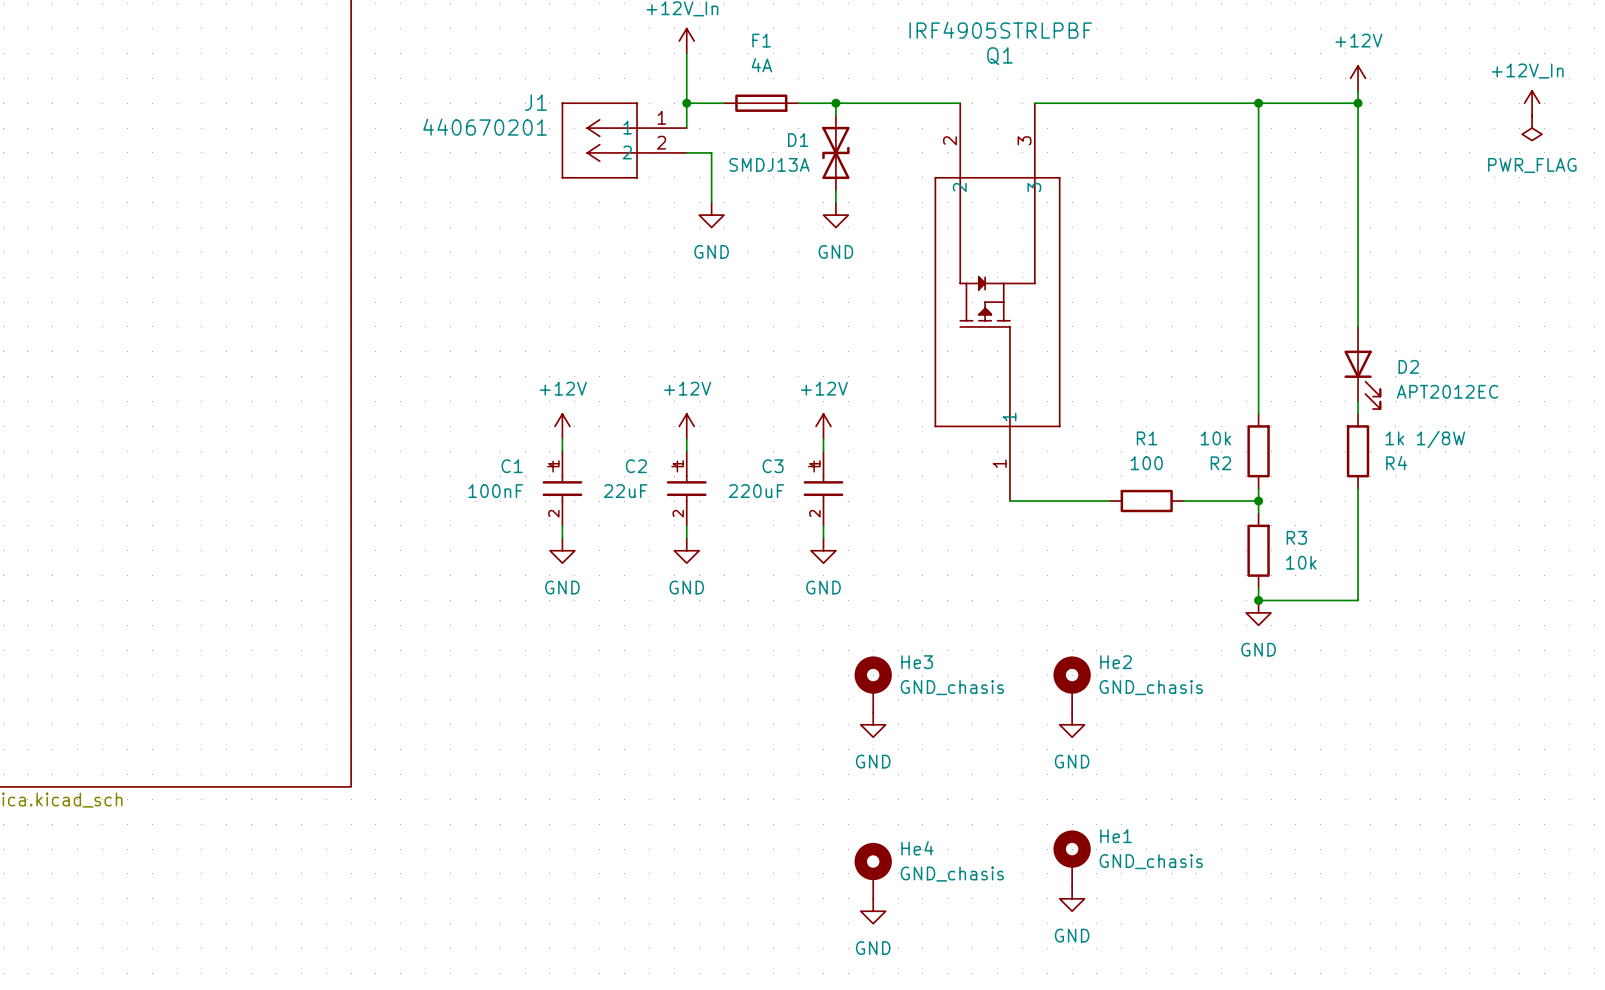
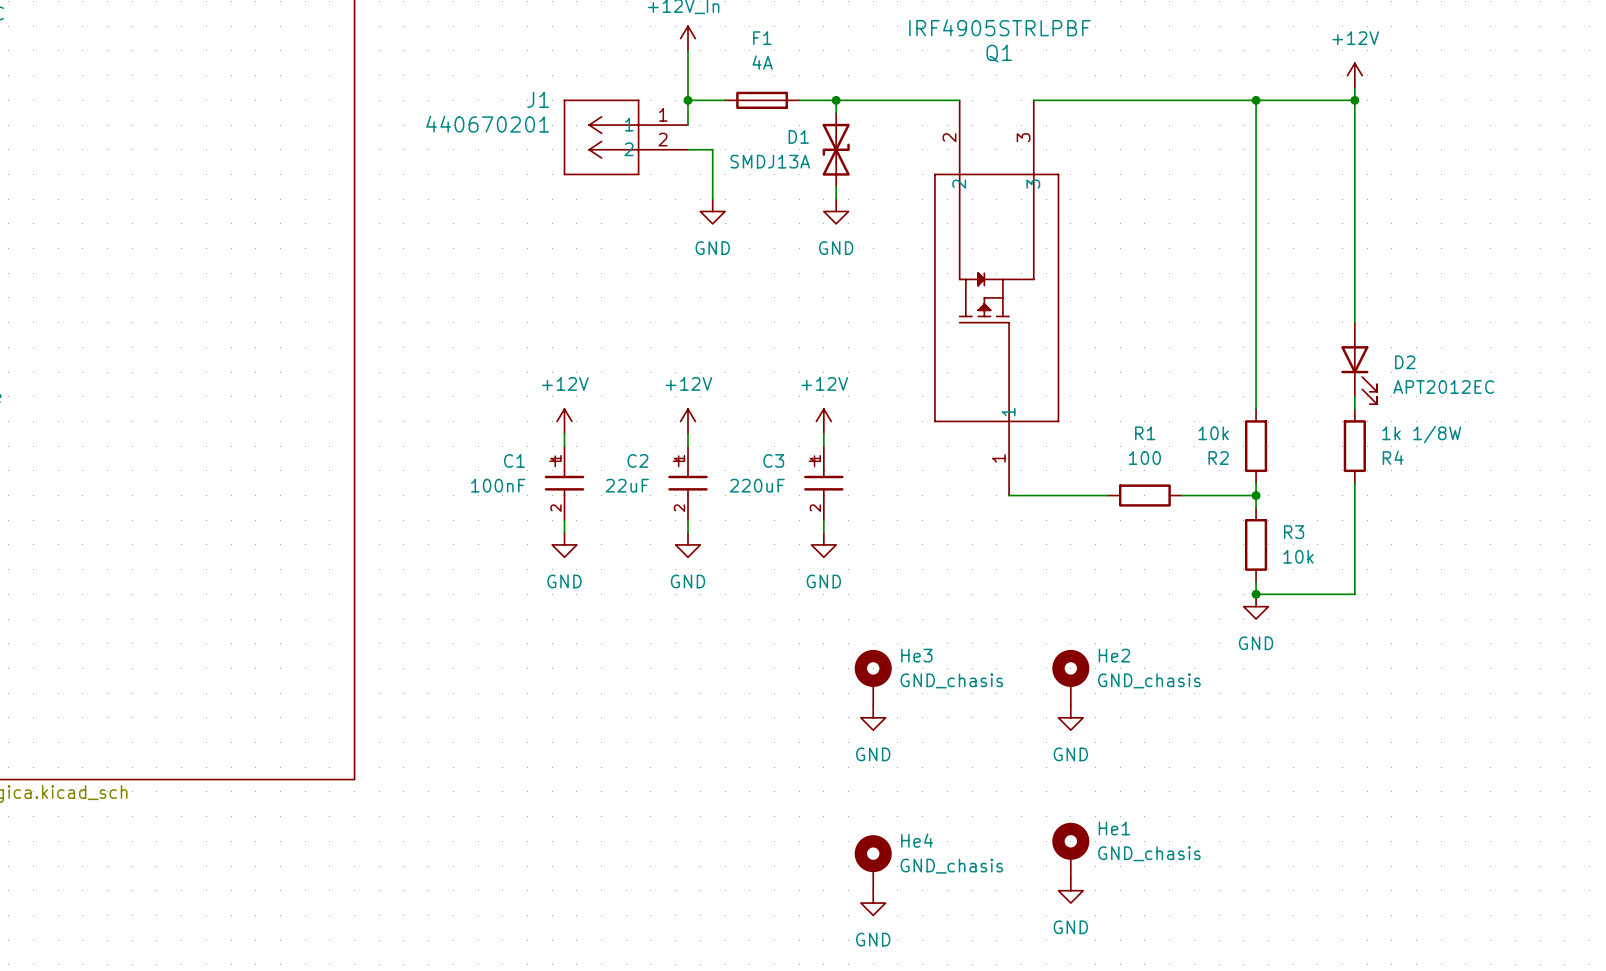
power symbol: +12V_In (1532, 103) -> none
power symbol: PWR_FLAG (1532, 128) -> none

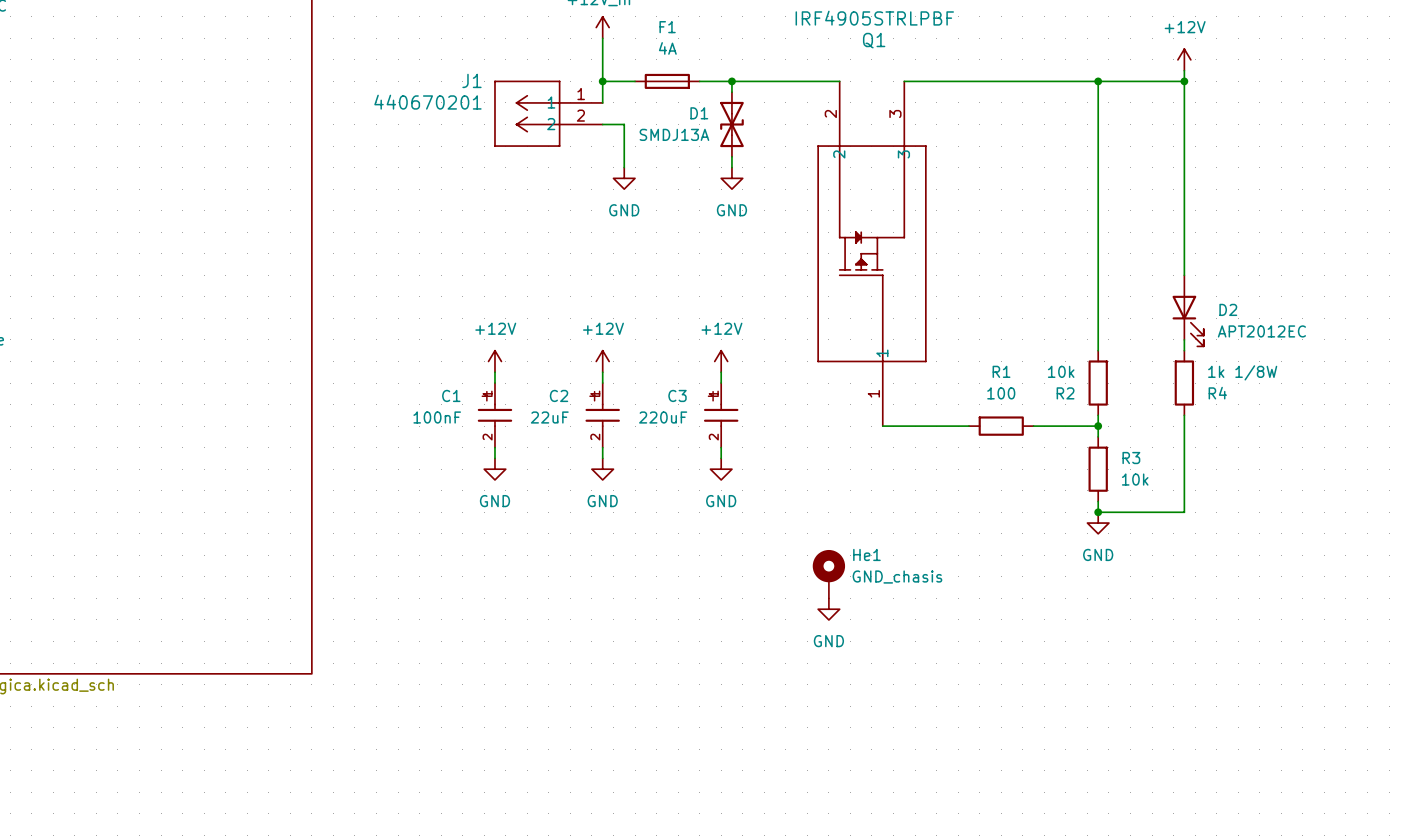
He3: GND_chasis (873, 677) -> none
He2: GND_chasis (1070, 677) -> none
power symbol: none -> GND (828, 609)
power symbol: GND (873, 717) -> none
power symbol: GND (1070, 717) -> none
He1 position: (1070, 850) -> (828, 574)
He4: GND_chasis (873, 862) -> none
power symbol: GND (1070, 890) -> none
power symbol: GND (873, 903) -> none

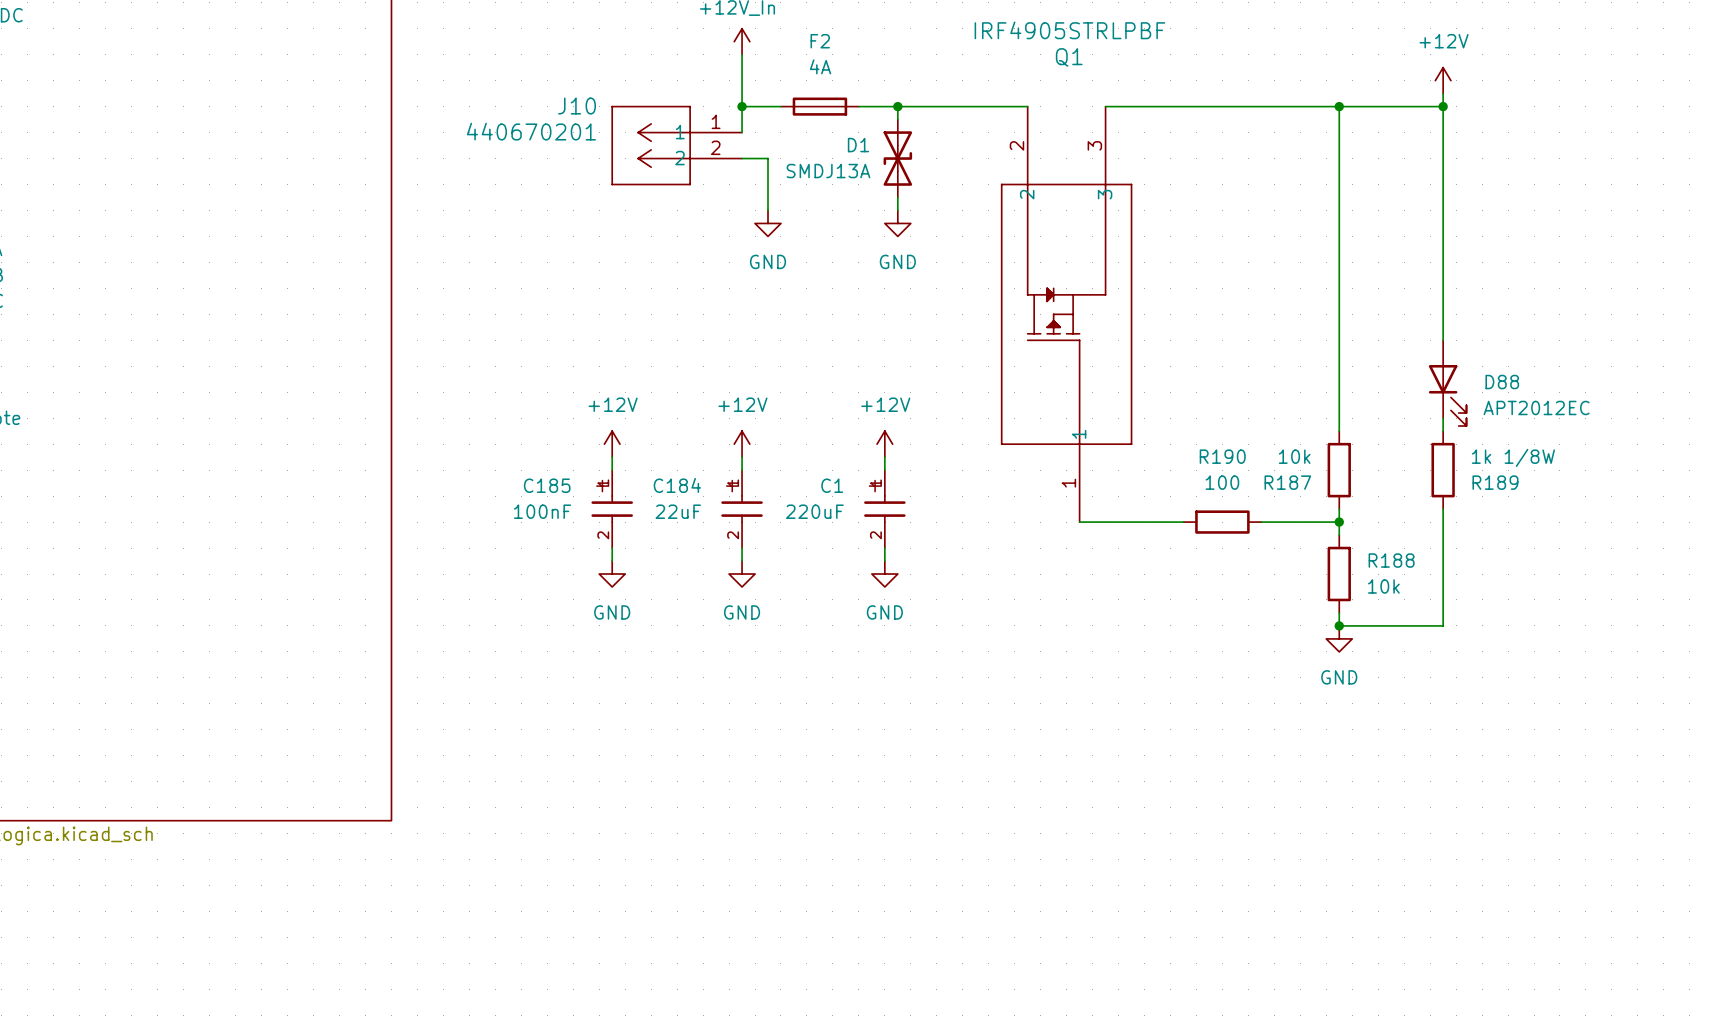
F1 name: F1 (667, 27) -> F2 (820, 41)
J1 name: J1 (471, 80) -> J10 (577, 106)
D2 name: D2 (1228, 309) -> D88 (1502, 382)
R1 name: R1 (1001, 371) -> R190 (1222, 456)
R2 name: R2 (1065, 393) -> R187 (1287, 482)
R4 name: R4 (1217, 393) -> R189 (1495, 482)
C1 name: C1 (451, 395) -> C185 (547, 485)
C2 name: C2 (559, 395) -> C184 (677, 485)
C3 name: C3 (677, 395) -> C1 (832, 485)
R3 name: R3 (1131, 458) -> R188 (1391, 560)
He1: GND_chasis (828, 574) -> none
power symbol: GND (828, 609) -> none

